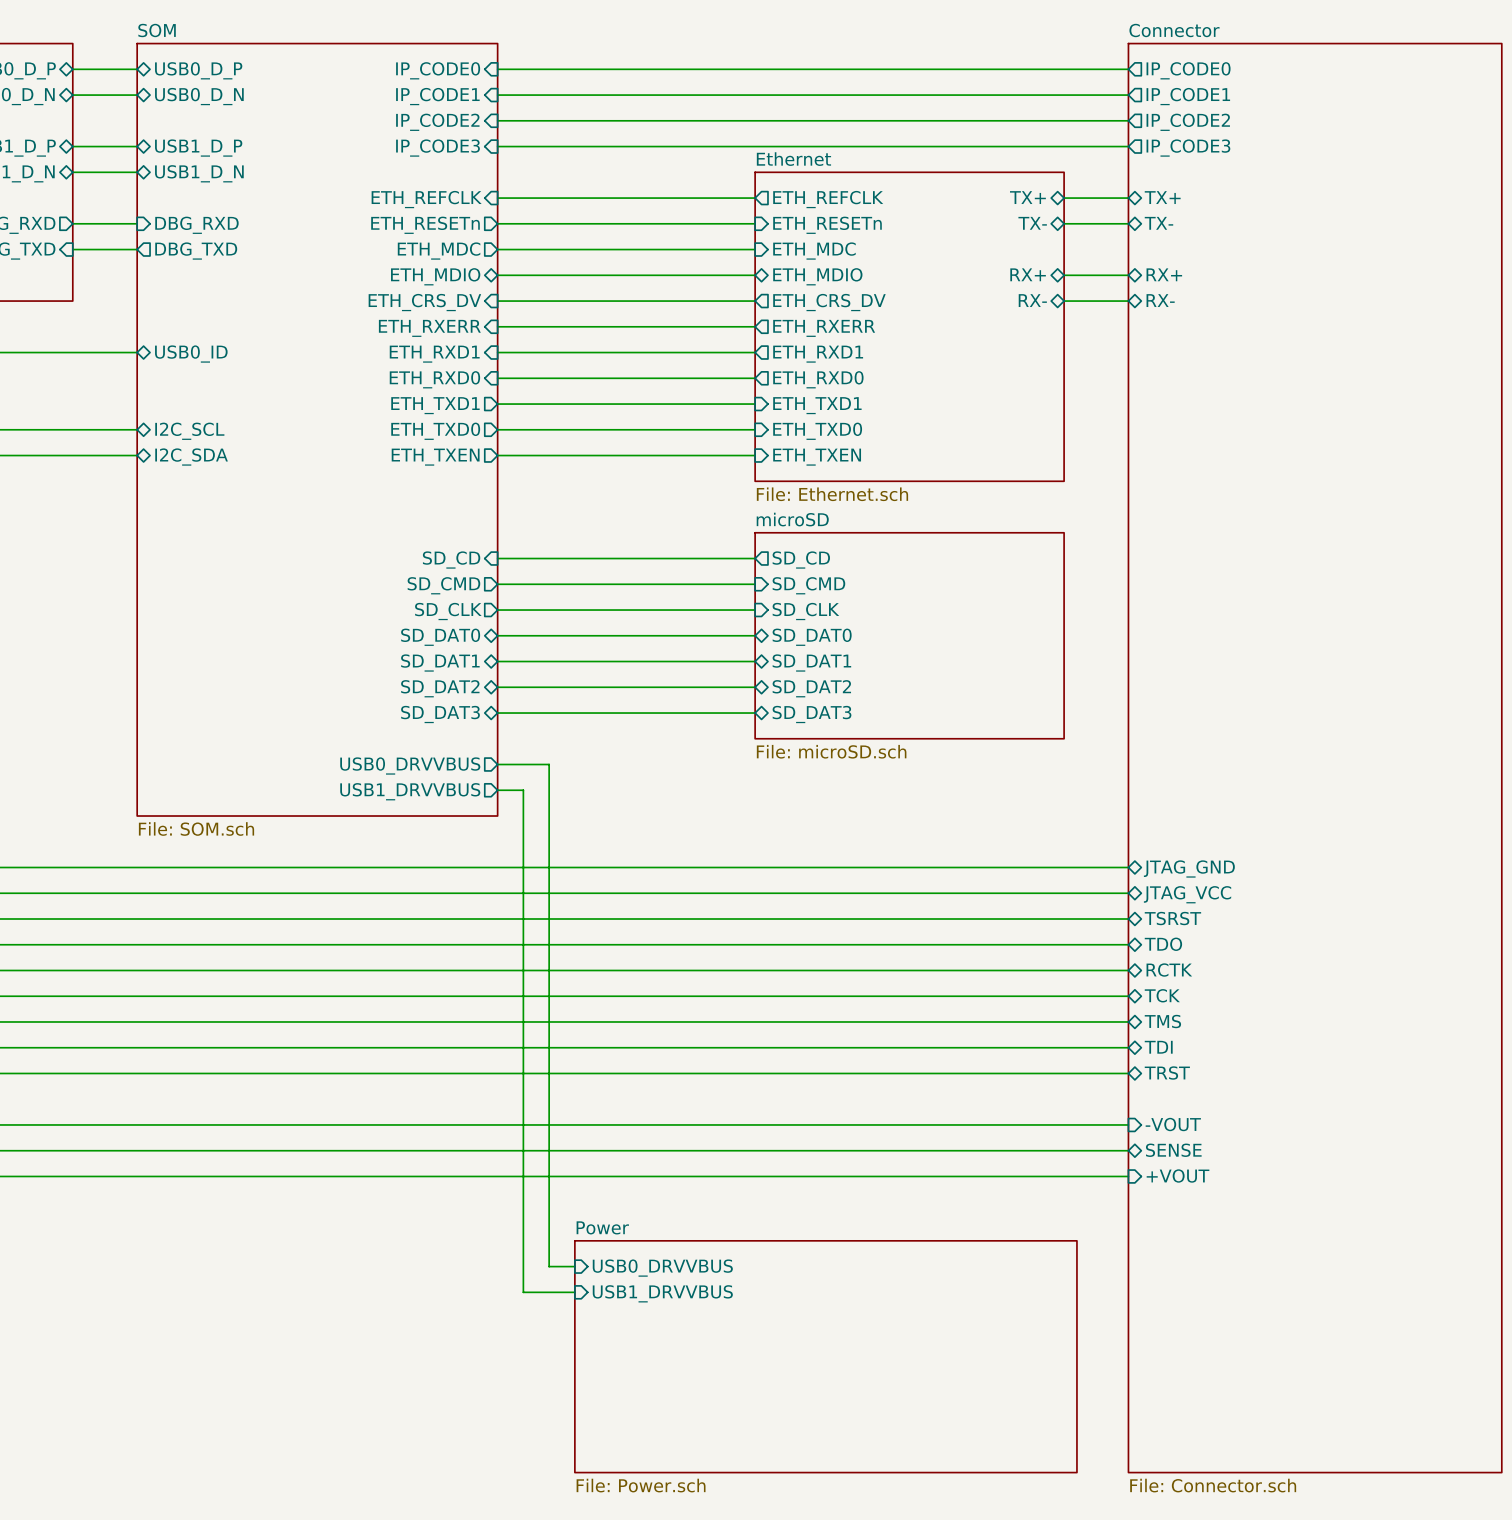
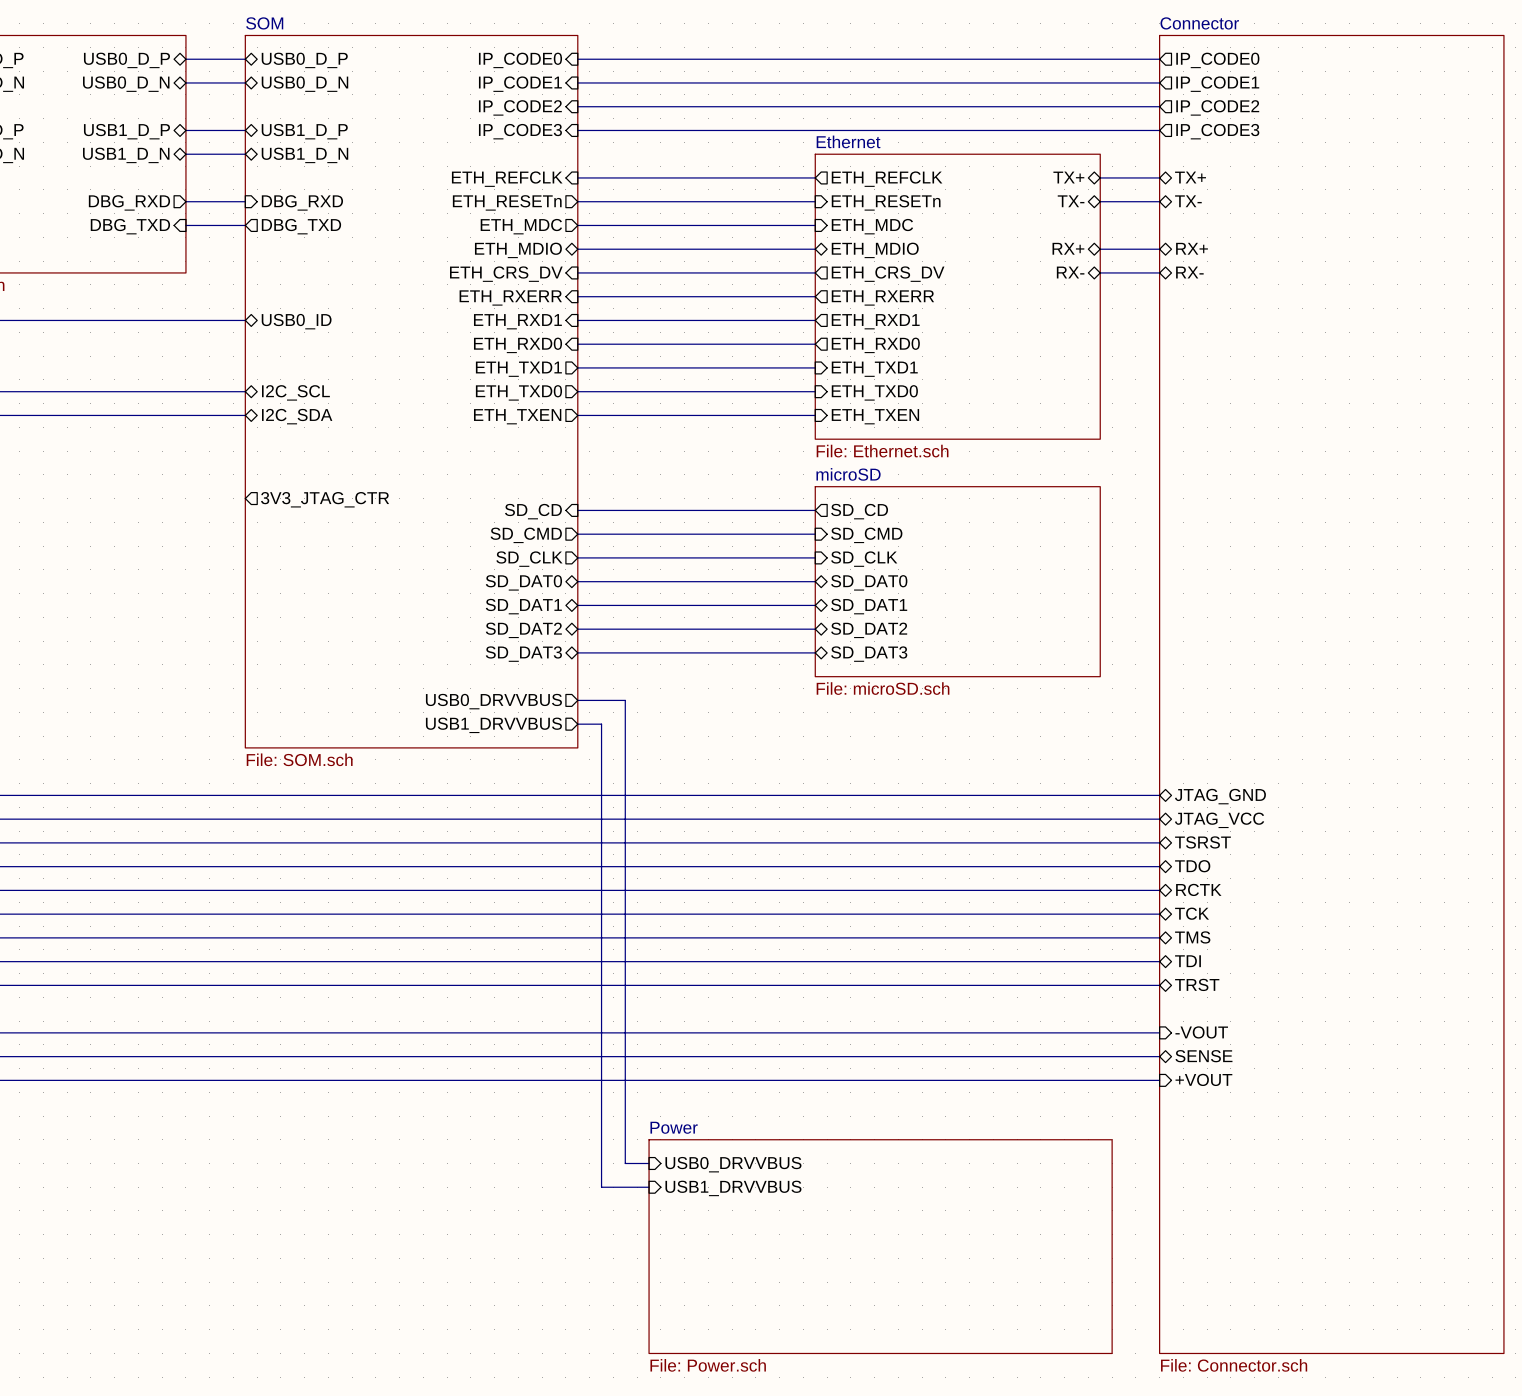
sheet pin: none -> 3V3_JTAG_CTR (325, 499)

